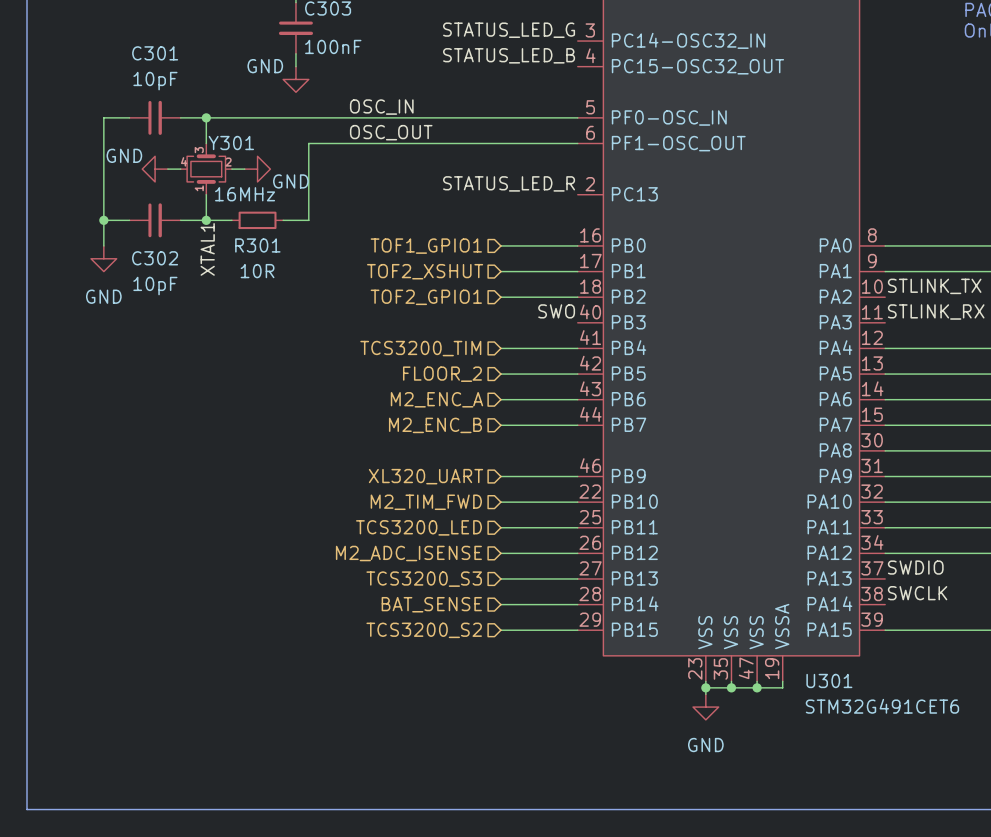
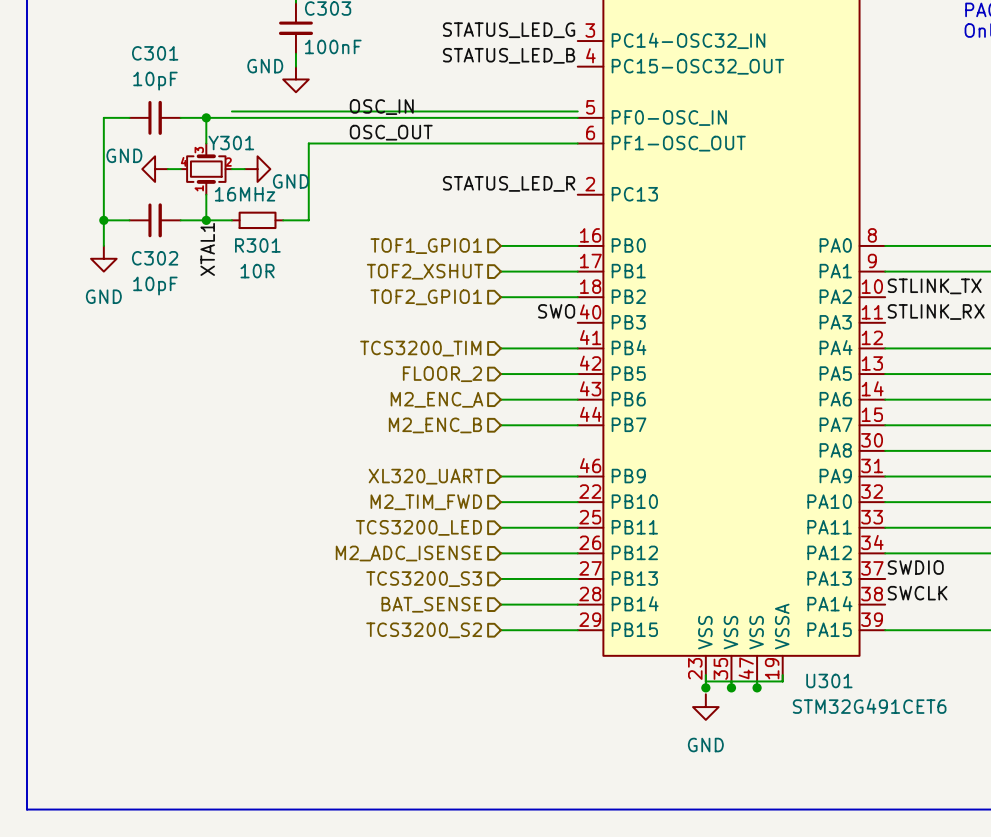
wire: none -> (231, 111) (577, 111)
wire: none -> (705, 675) (705, 681) (782, 681) (782, 675)
wire: (782, 681) (782, 687) (705, 687) (705, 694) -> none
U301 value position: STM32G491CET6 (882, 706) -> STM32G491CET6 (869, 706)

